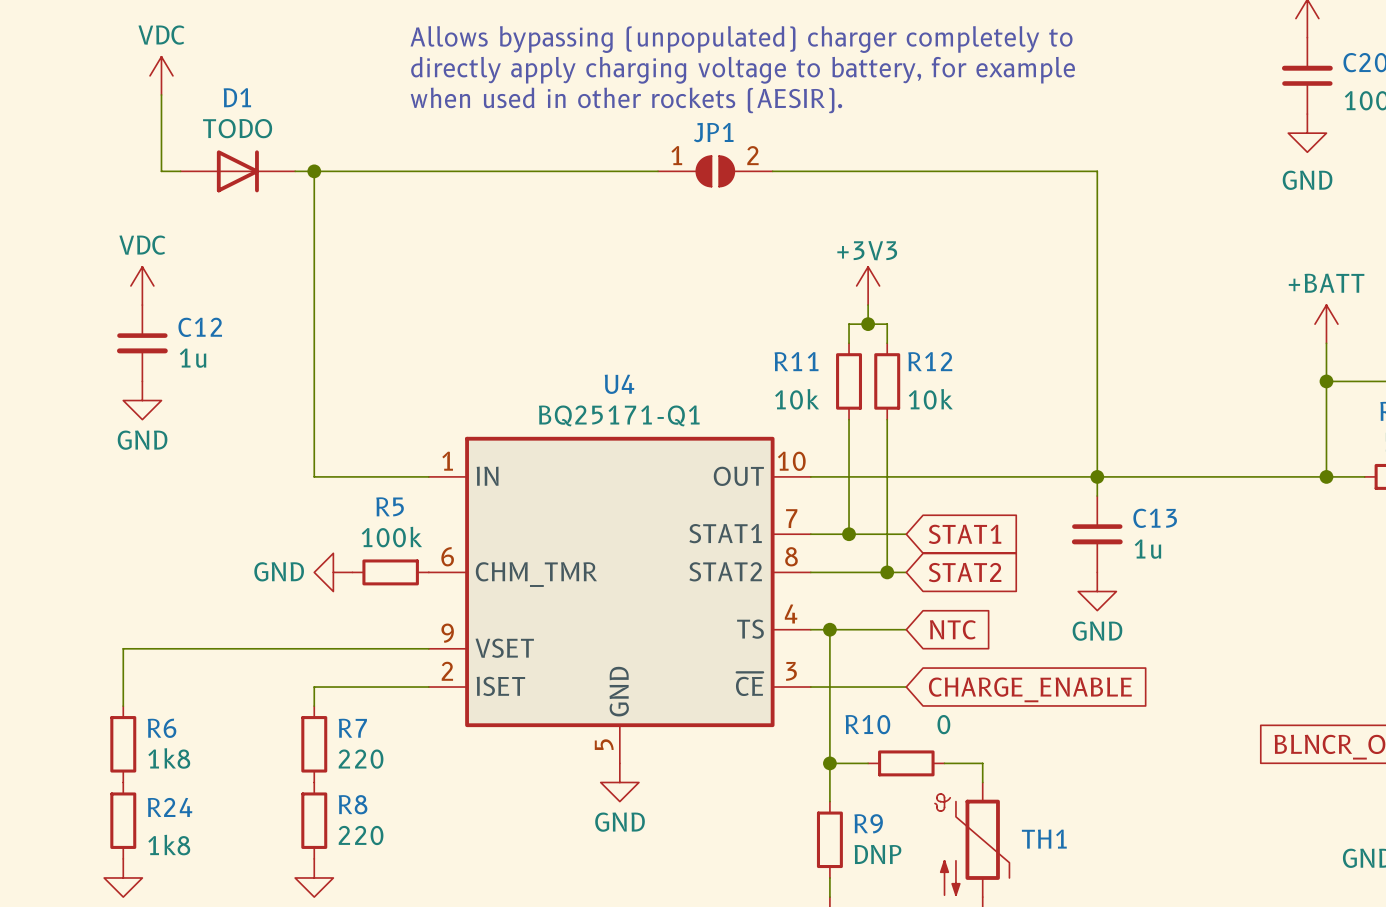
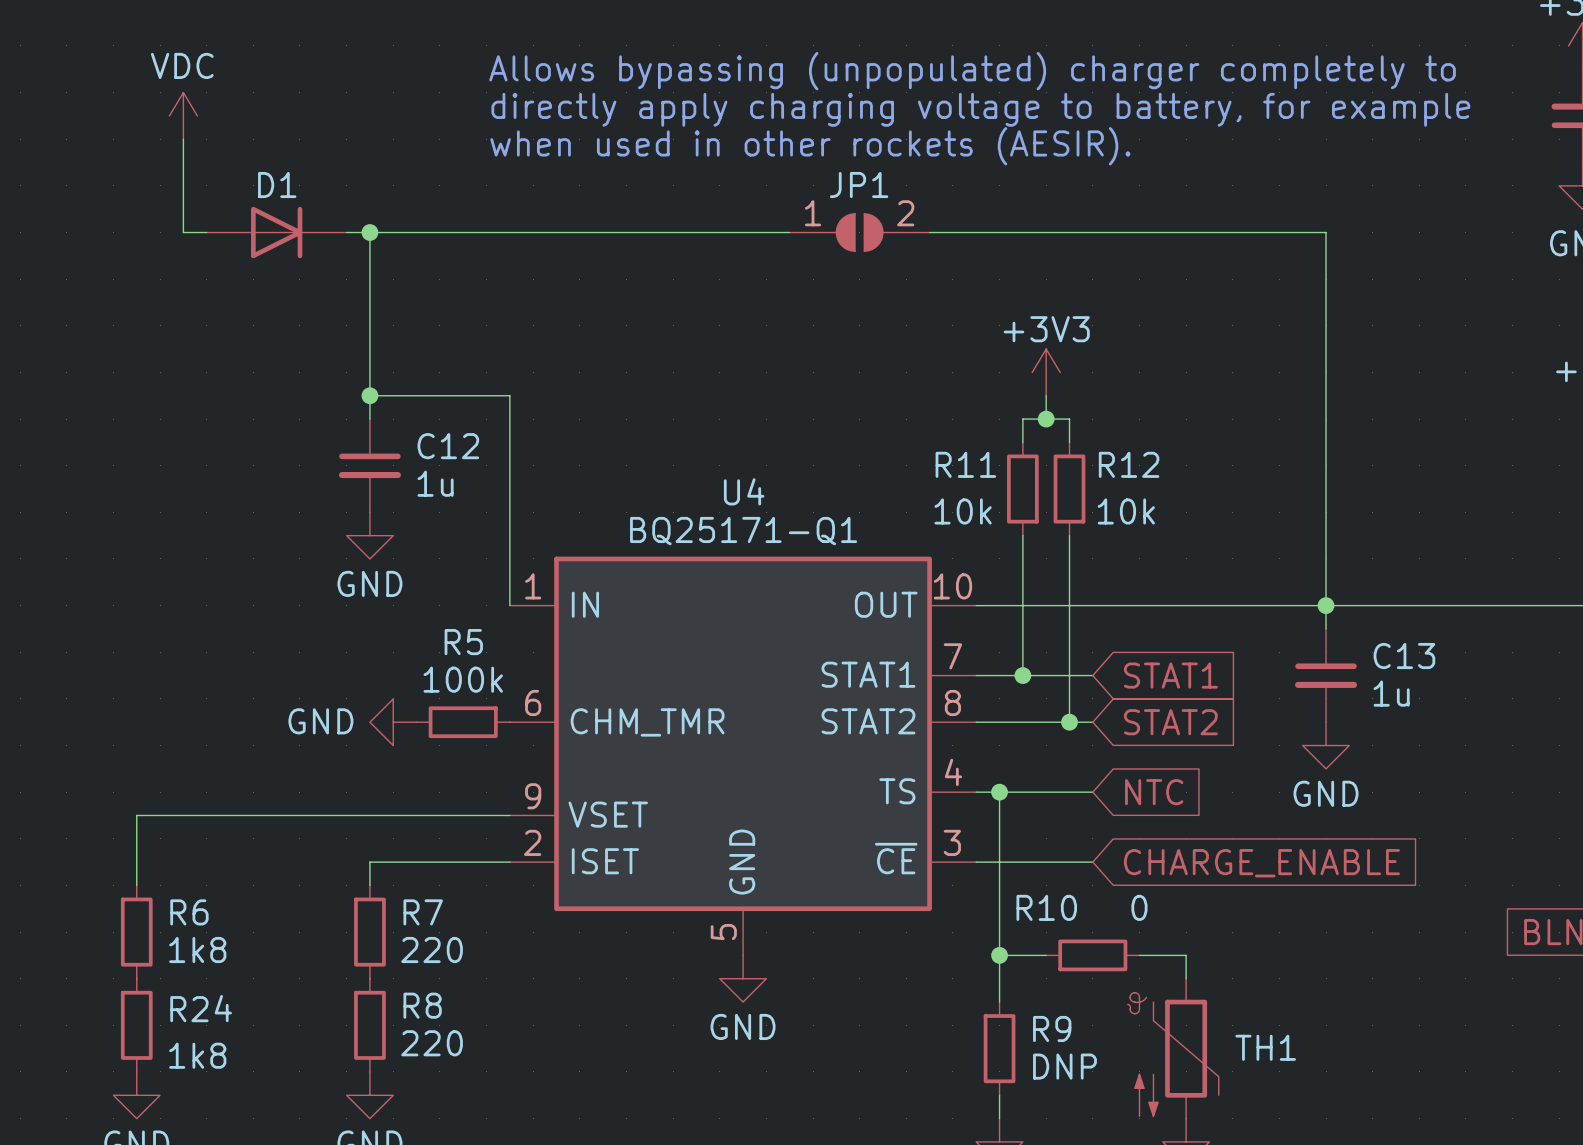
D1 name position: D1 (237, 97) -> D1 (277, 185)
D1 value: TODO (237, 128) -> none
power symbol: VDC (142, 285) -> none
junction: none -> (369, 395)
wire: (314, 324) (314, 476) (428, 476) -> (369, 395) (509, 395) (509, 605)
C12 position: (142, 343) -> (369, 465)
power symbol position: GND (142, 400) -> GND (369, 535)

